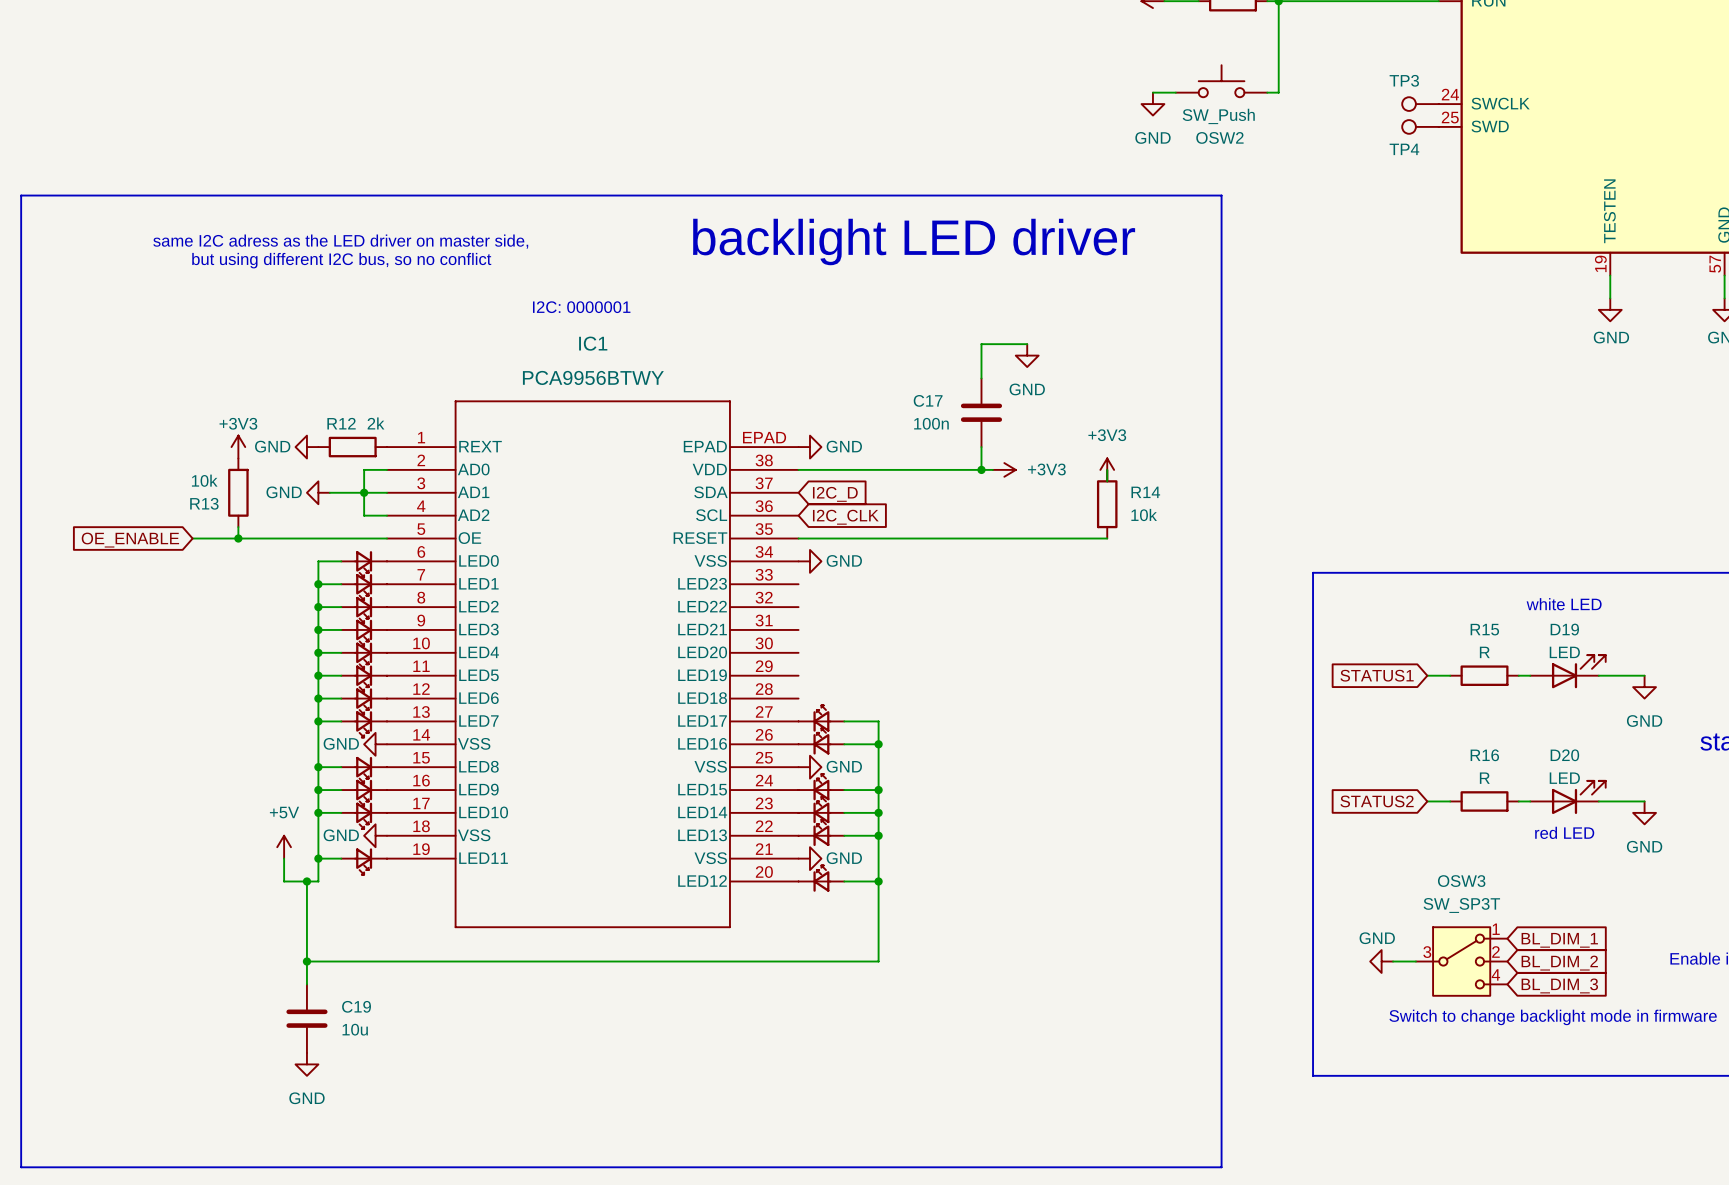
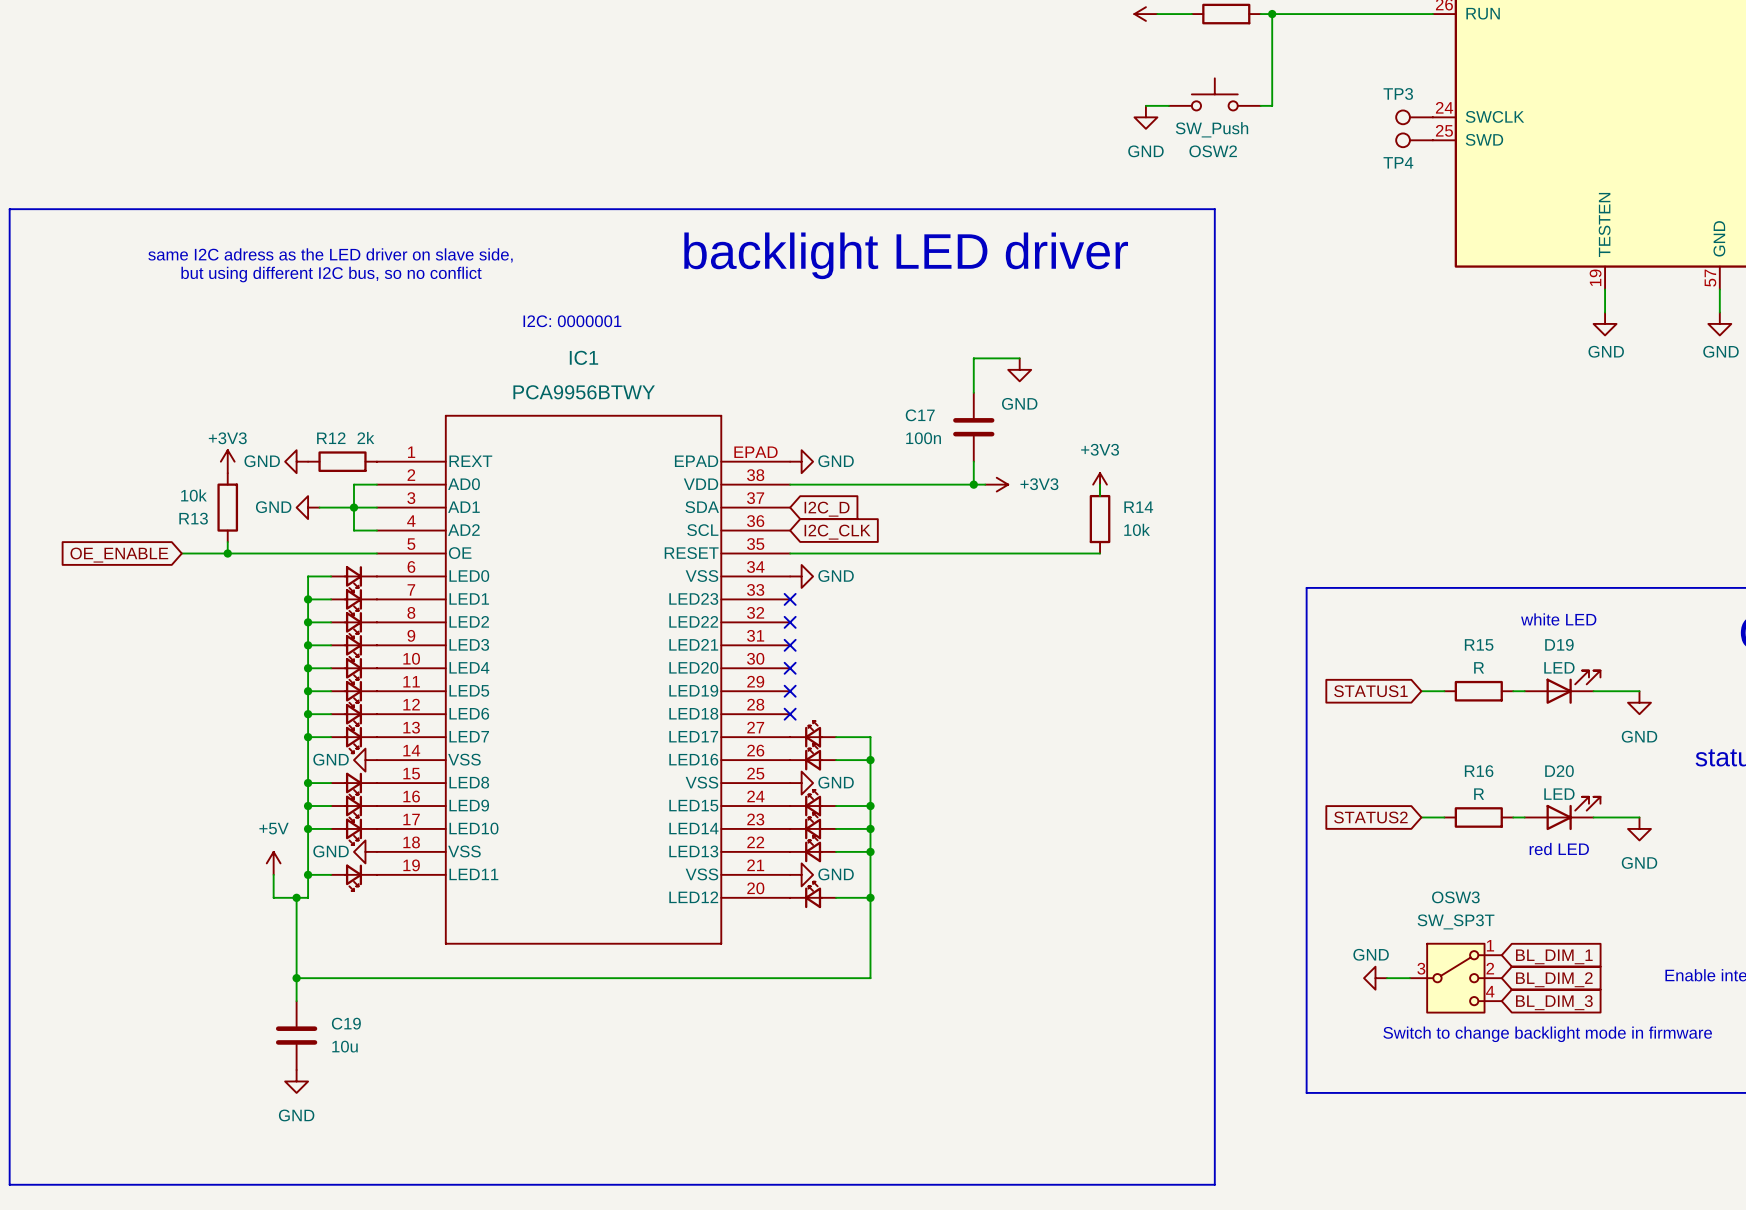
text: same I2C adress as the LED driver on master side, (340, 241) -> same I2C adress as the LED driver on slave side, (330, 255)
no-connect mark: none -> (790, 599)
no-connect mark: none -> (790, 622)
no-connect mark: none -> (790, 645)
no-connect mark: none -> (790, 668)
no-connect mark: none -> (790, 691)
no-connect mark: none -> (790, 714)

